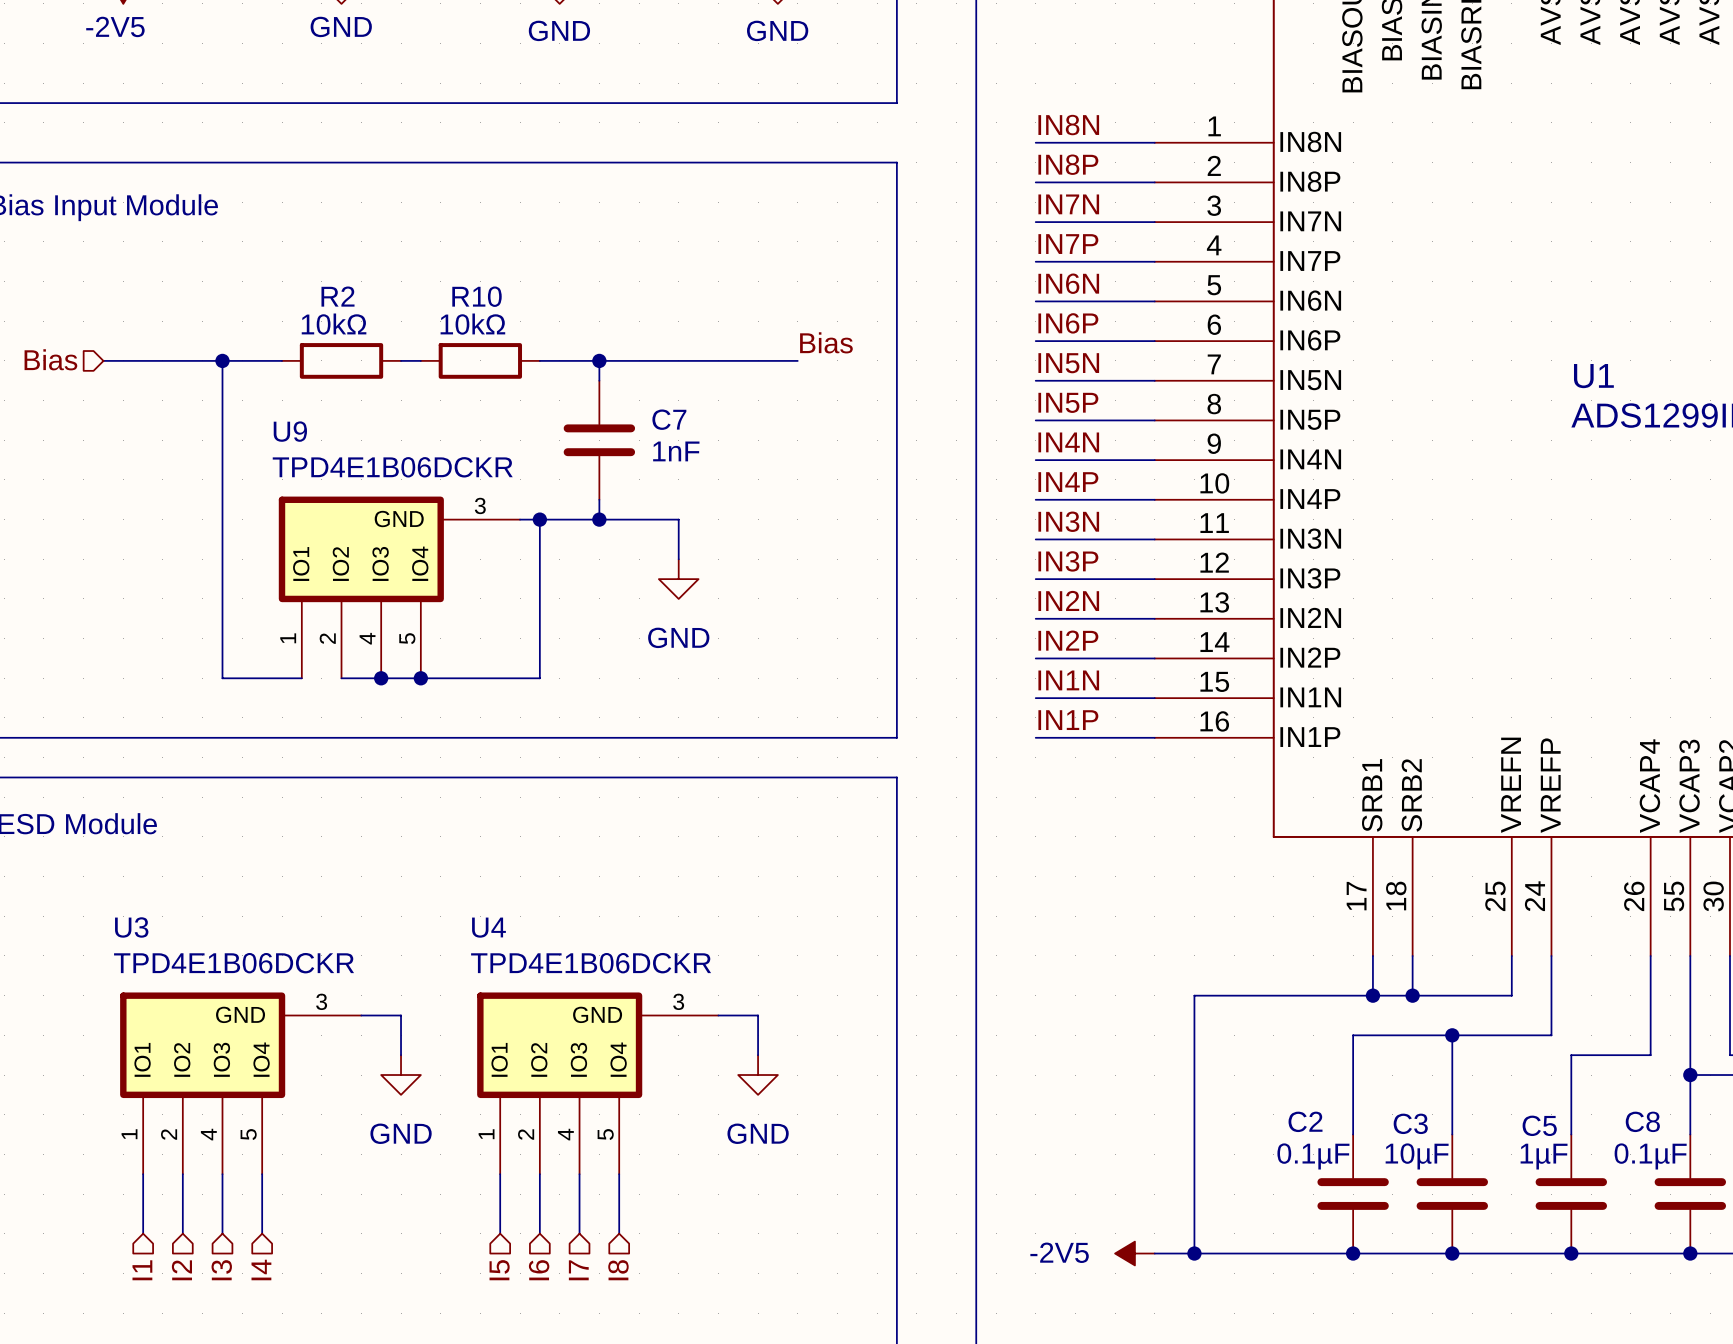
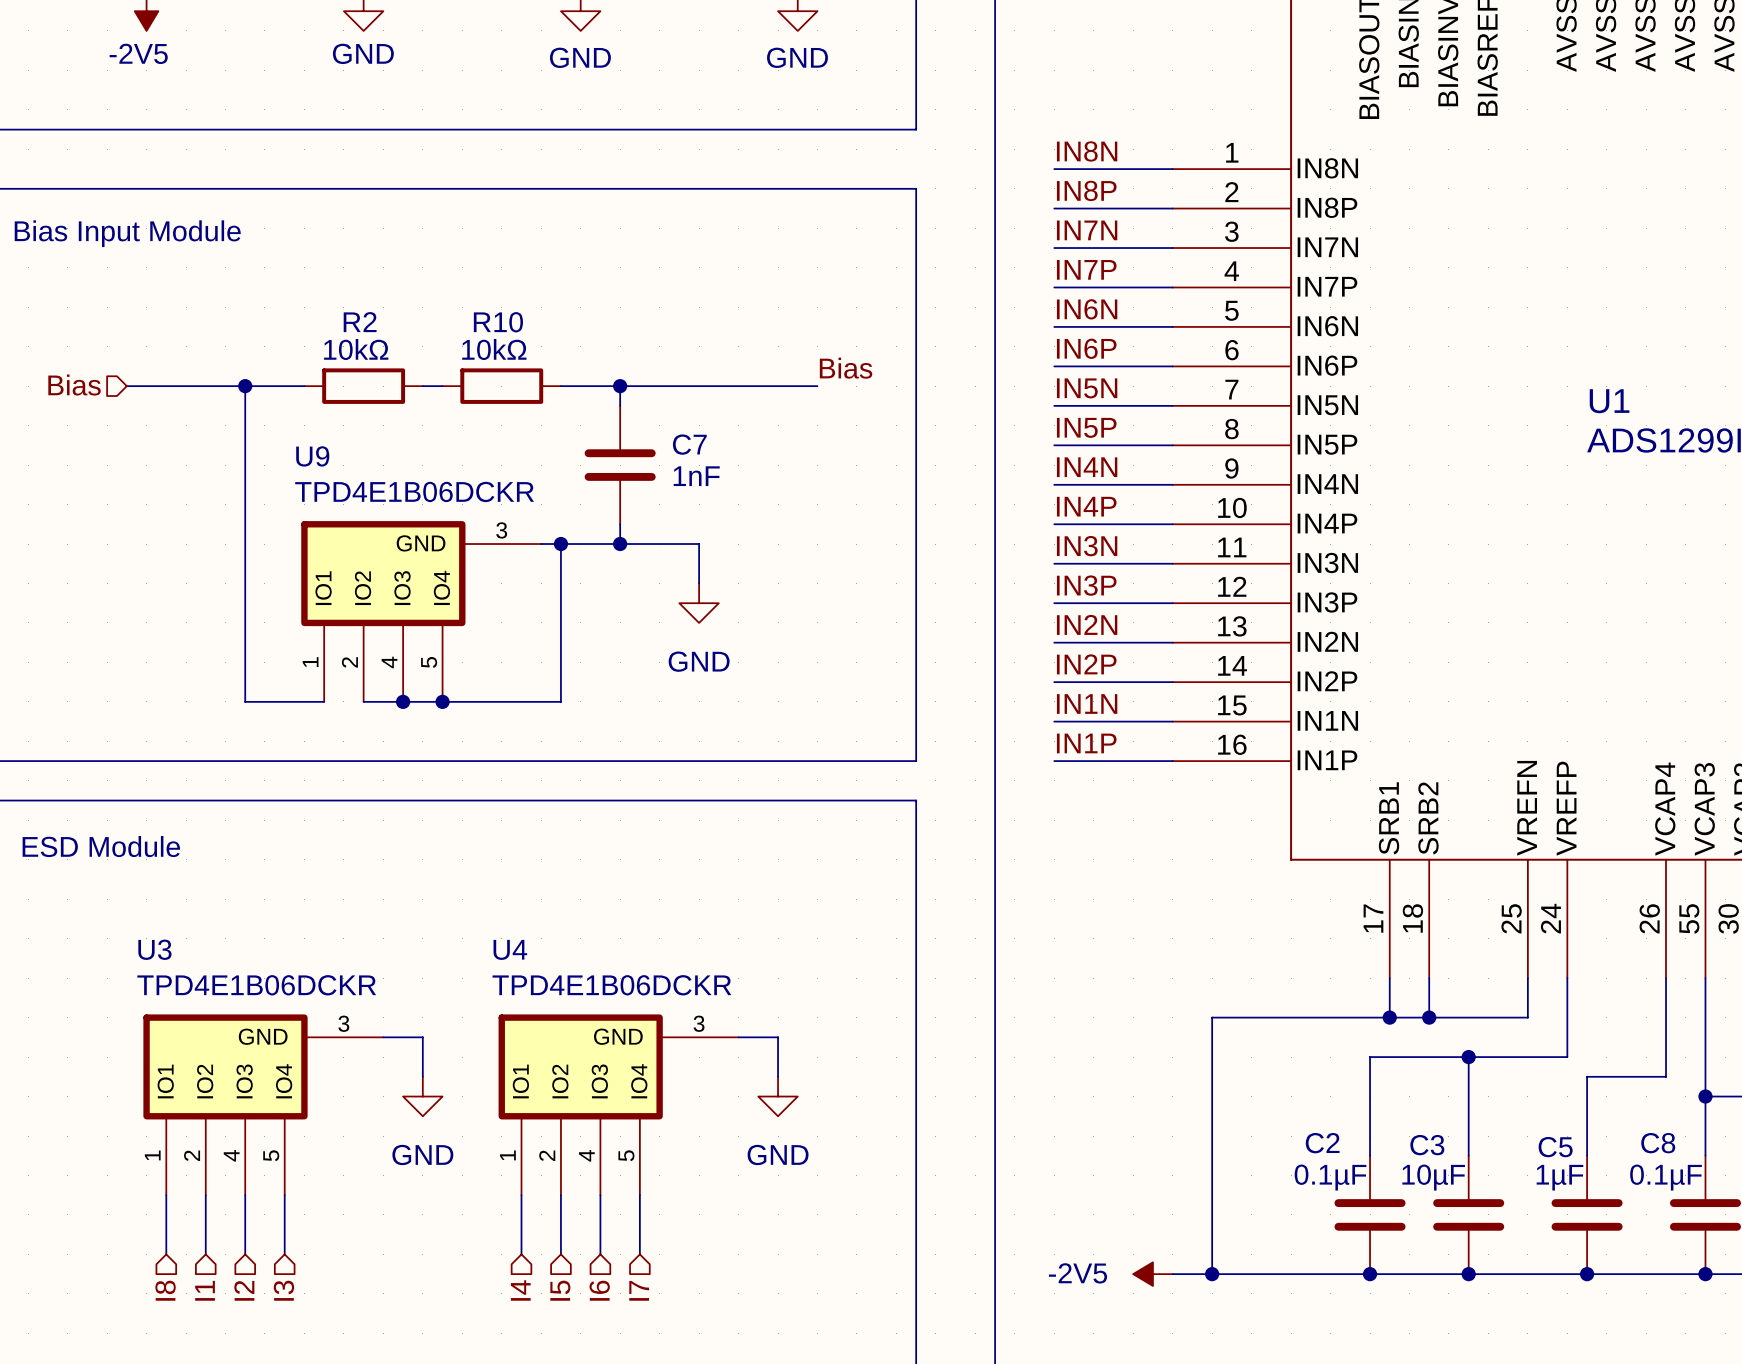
hierarchical label: I1 (142, 1270) -> I8 (165, 1290)
hierarchical label: I2 (181, 1270) -> I1 (205, 1290)
hierarchical label: I3 (221, 1270) -> I2 (244, 1290)
hierarchical label: I4 (261, 1270) -> I3 (283, 1290)
hierarchical label: I5 (499, 1270) -> I4 (520, 1290)
hierarchical label: I6 (539, 1270) -> I5 (560, 1290)
hierarchical label: I7 (578, 1270) -> I6 (599, 1290)
hierarchical label: I8 (618, 1270) -> I7 (639, 1290)

